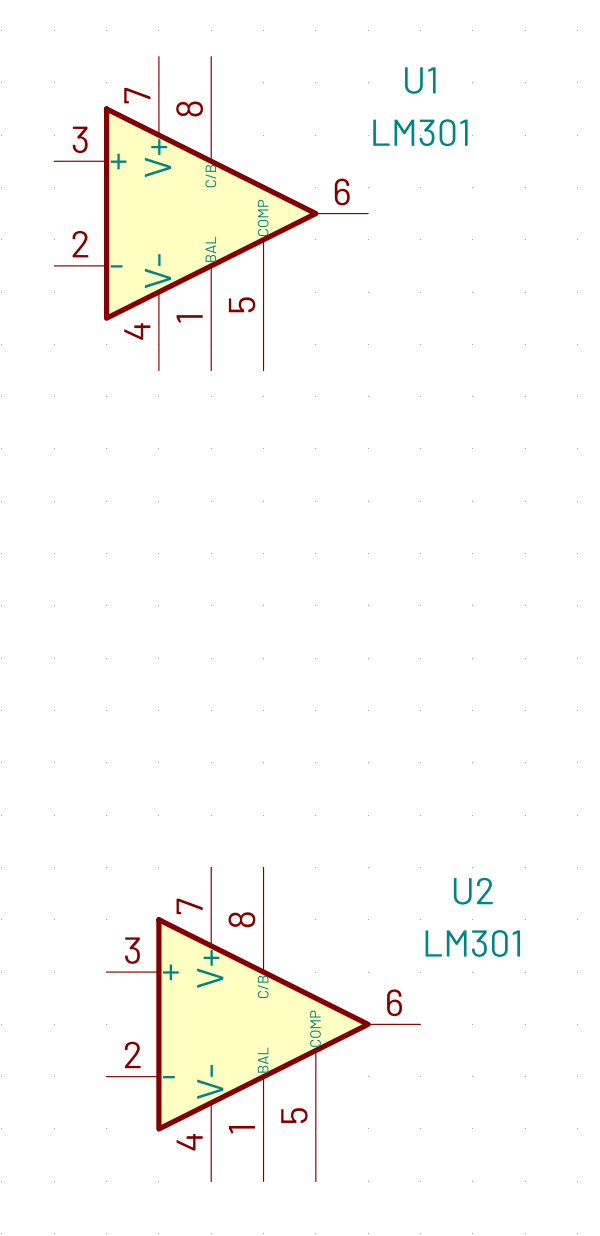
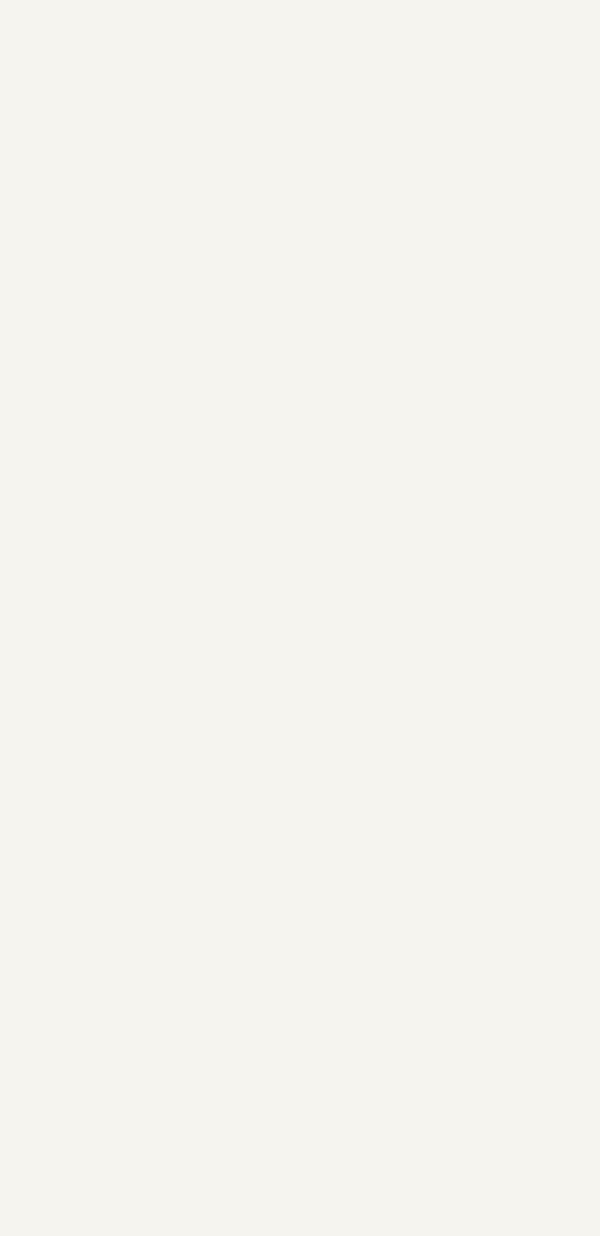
U1: LM301 (211, 213) -> none
U2: LM301 (263, 1024) -> none

